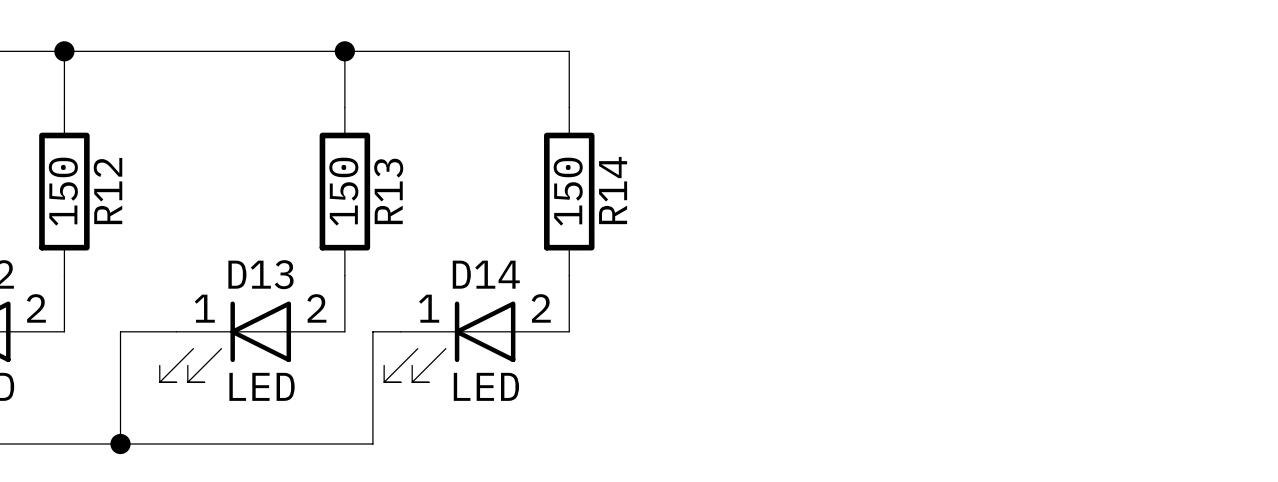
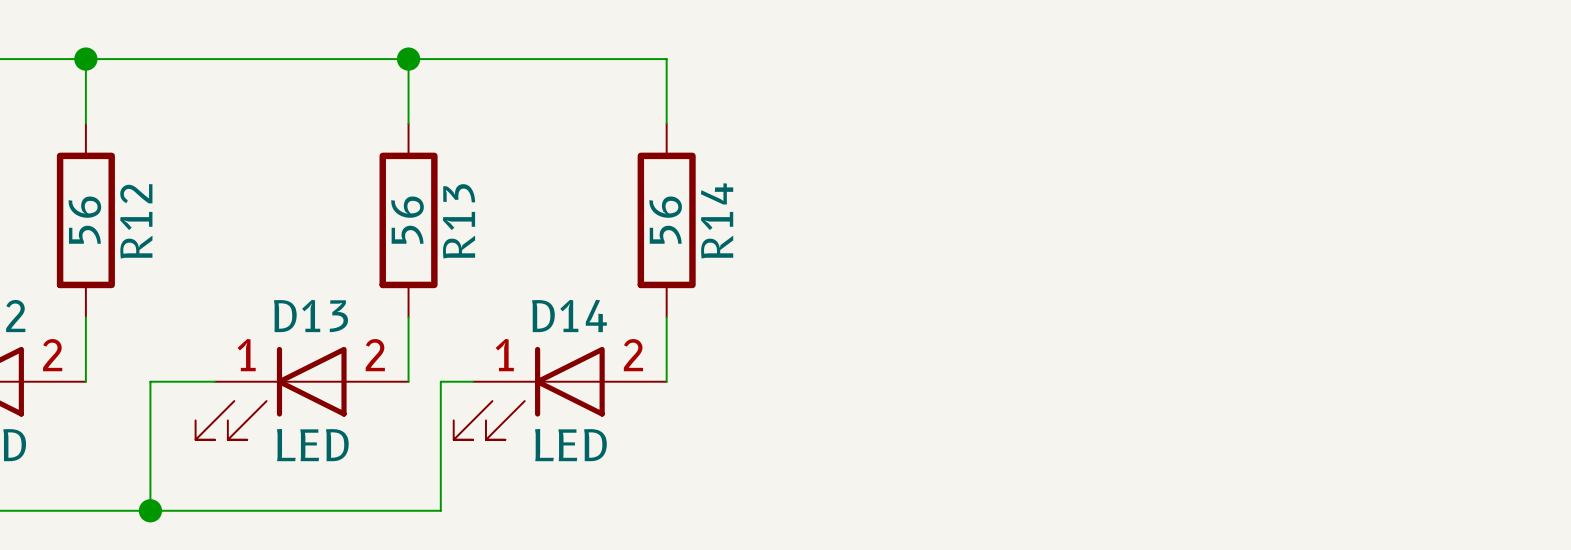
R12 value: 150 (63, 191) -> 56 (84, 220)
R13 value: 150 (343, 191) -> 56 (407, 220)
R14 value: 150 (568, 191) -> 56 (665, 220)

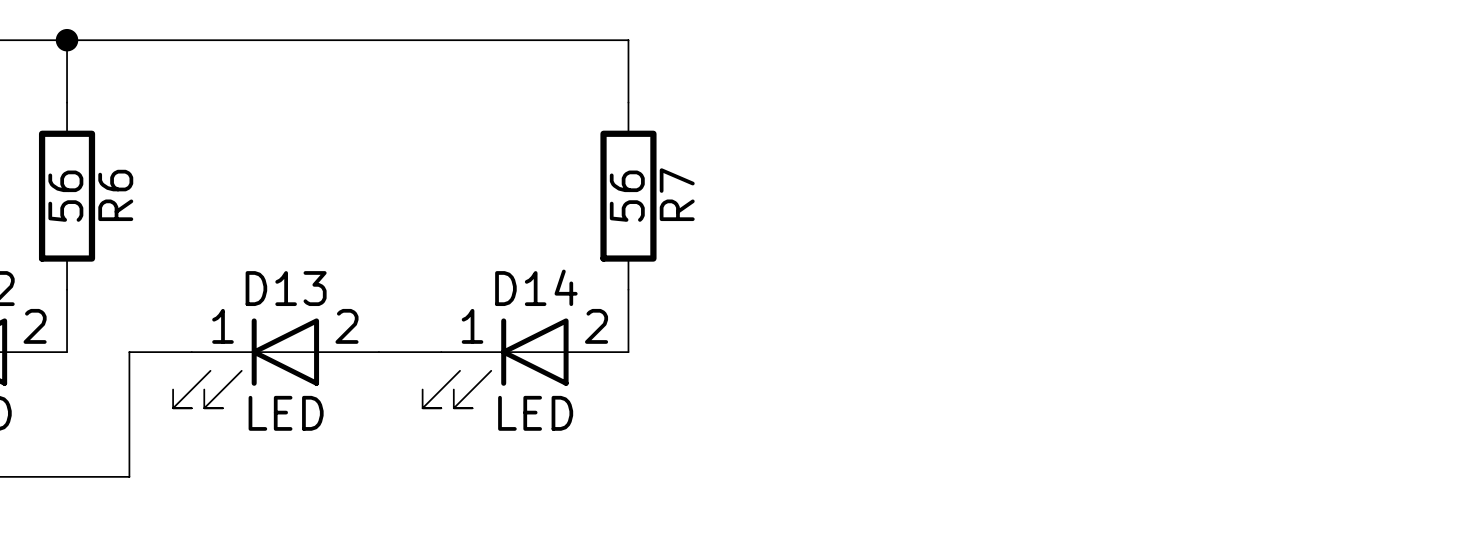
wire: (408, 59) (408, 123) -> none
junction: (408, 59) -> none
R13: 56 (408, 220) -> none
R14 name: R14 (717, 220) -> R7 (677, 194)
R12 name: R12 (136, 221) -> R6 (115, 195)
wire: (408, 317) (408, 381) -> (410, 352) (378, 352)
wire: (440, 381) (440, 510) (150, 510) -> none
junction: (150, 510) -> none

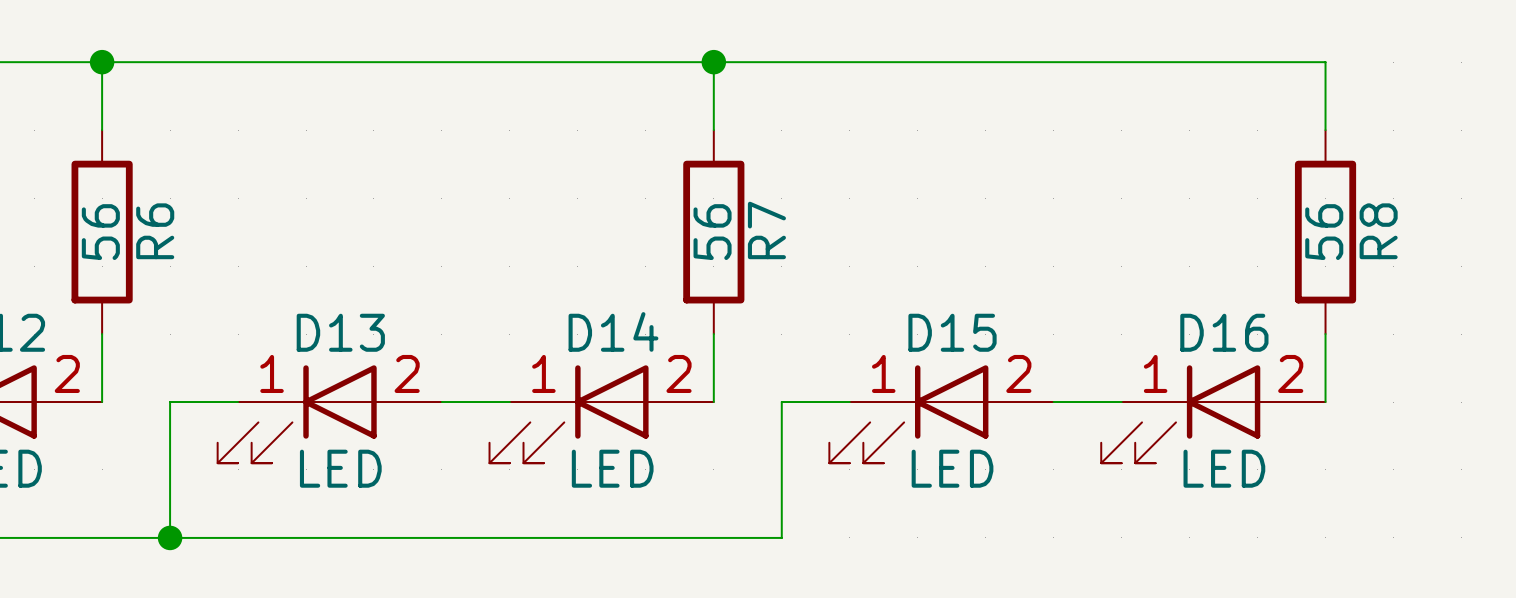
wire: none -> (713, 62) (1325, 62) (1325, 130)
junction: none -> (713, 62)
R8: none -> 56 (1325, 232)
wire: none -> (1325, 334) (1325, 402)
wire: none -> (849, 402) (781, 402) (781, 537) (170, 537)
wire: none -> (1053, 402) (1121, 402)
D15: none -> LED (941, 414)
D16: none -> LED (1213, 414)
junction: none -> (170, 537)

